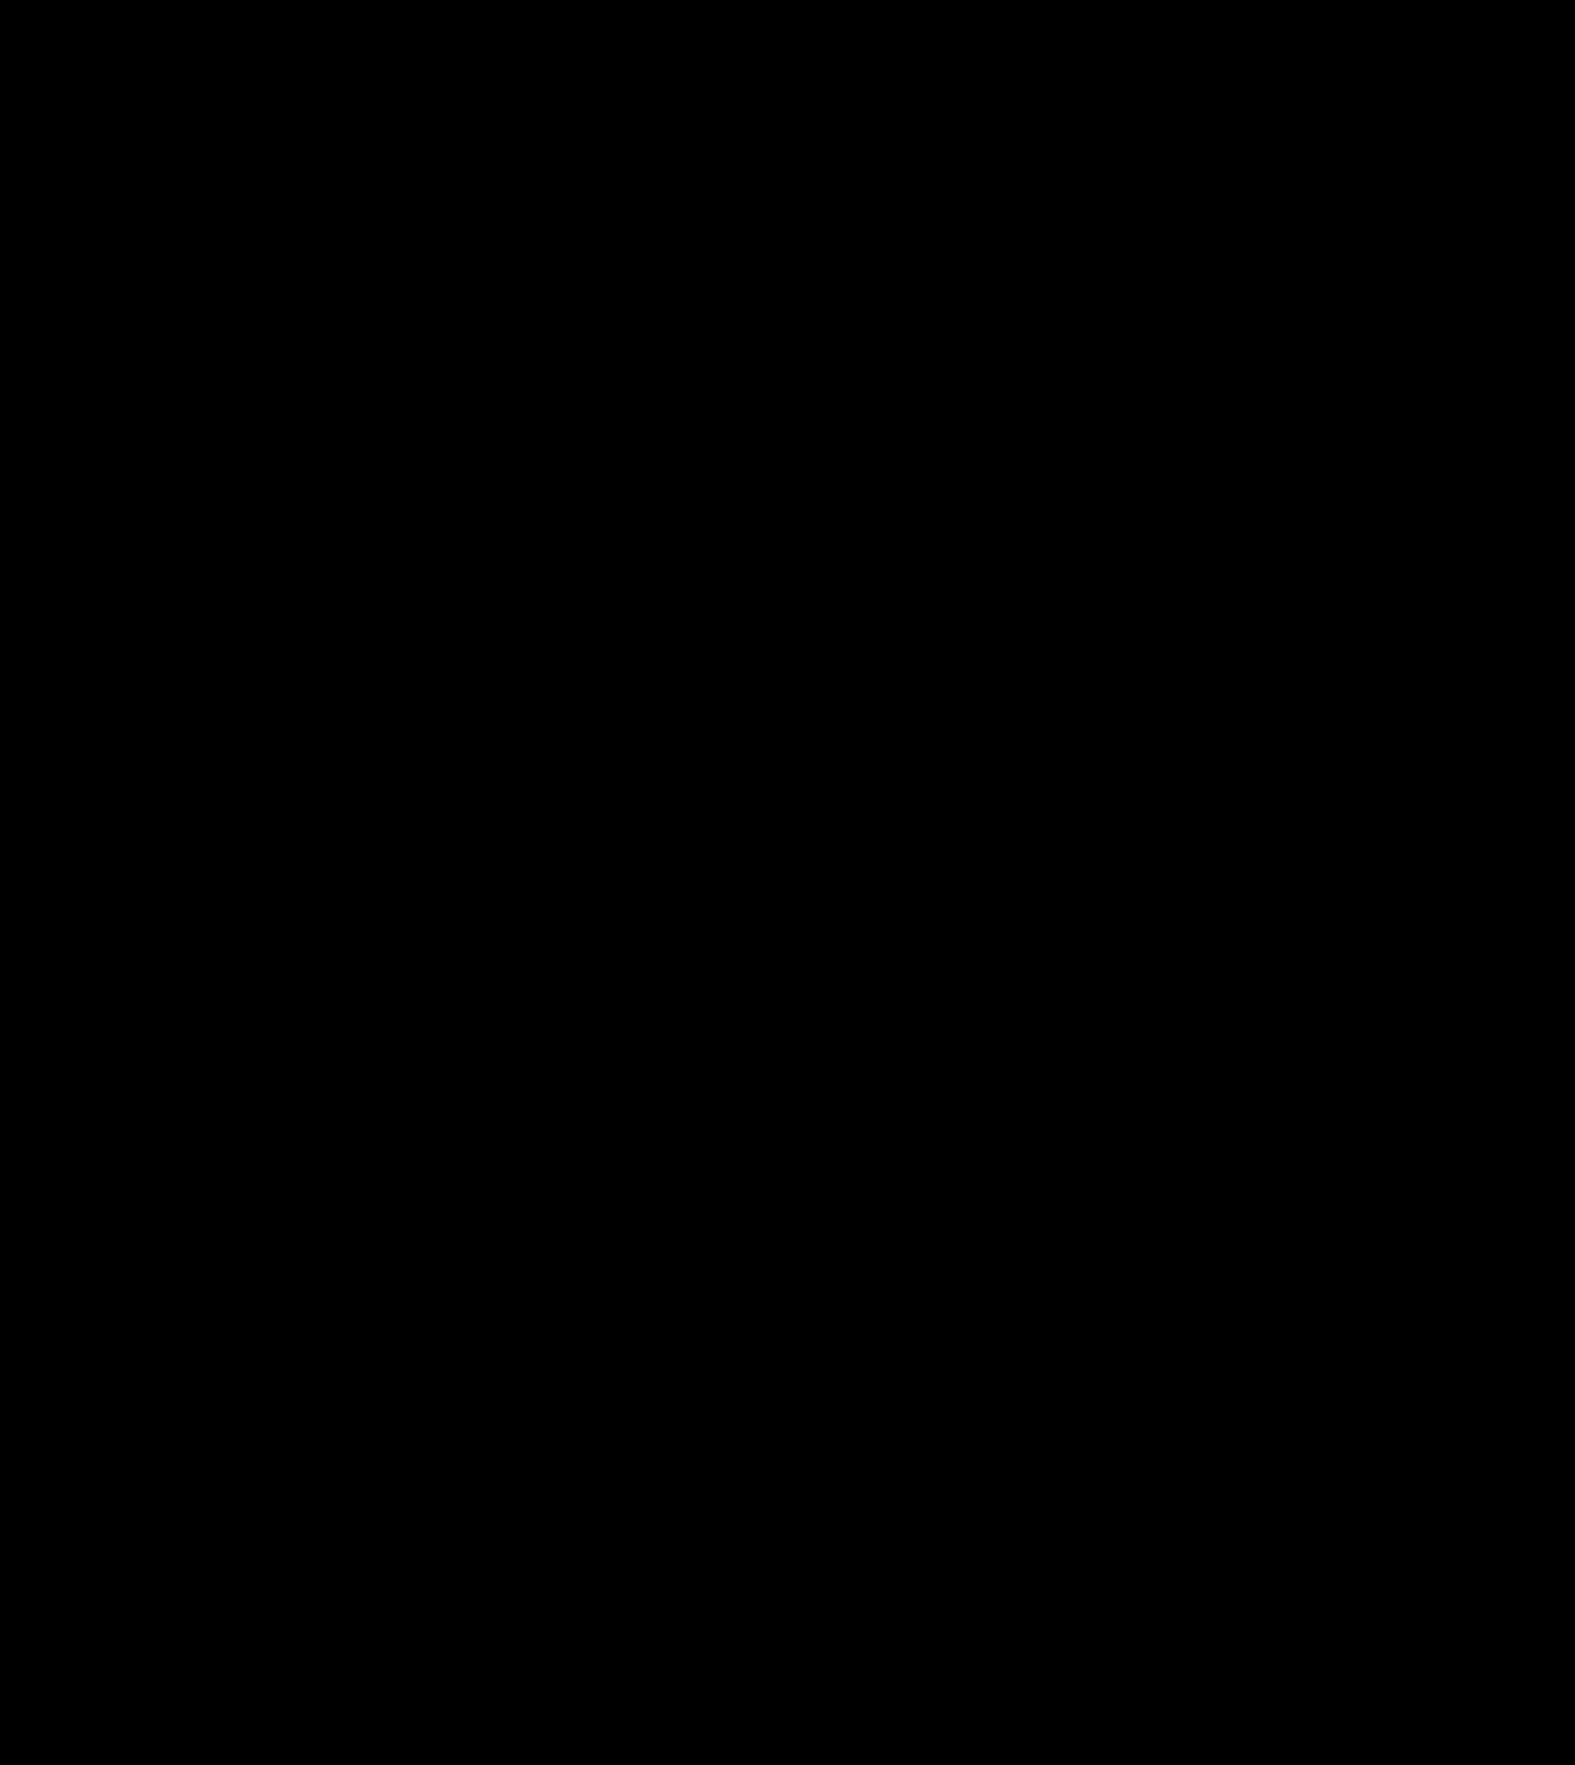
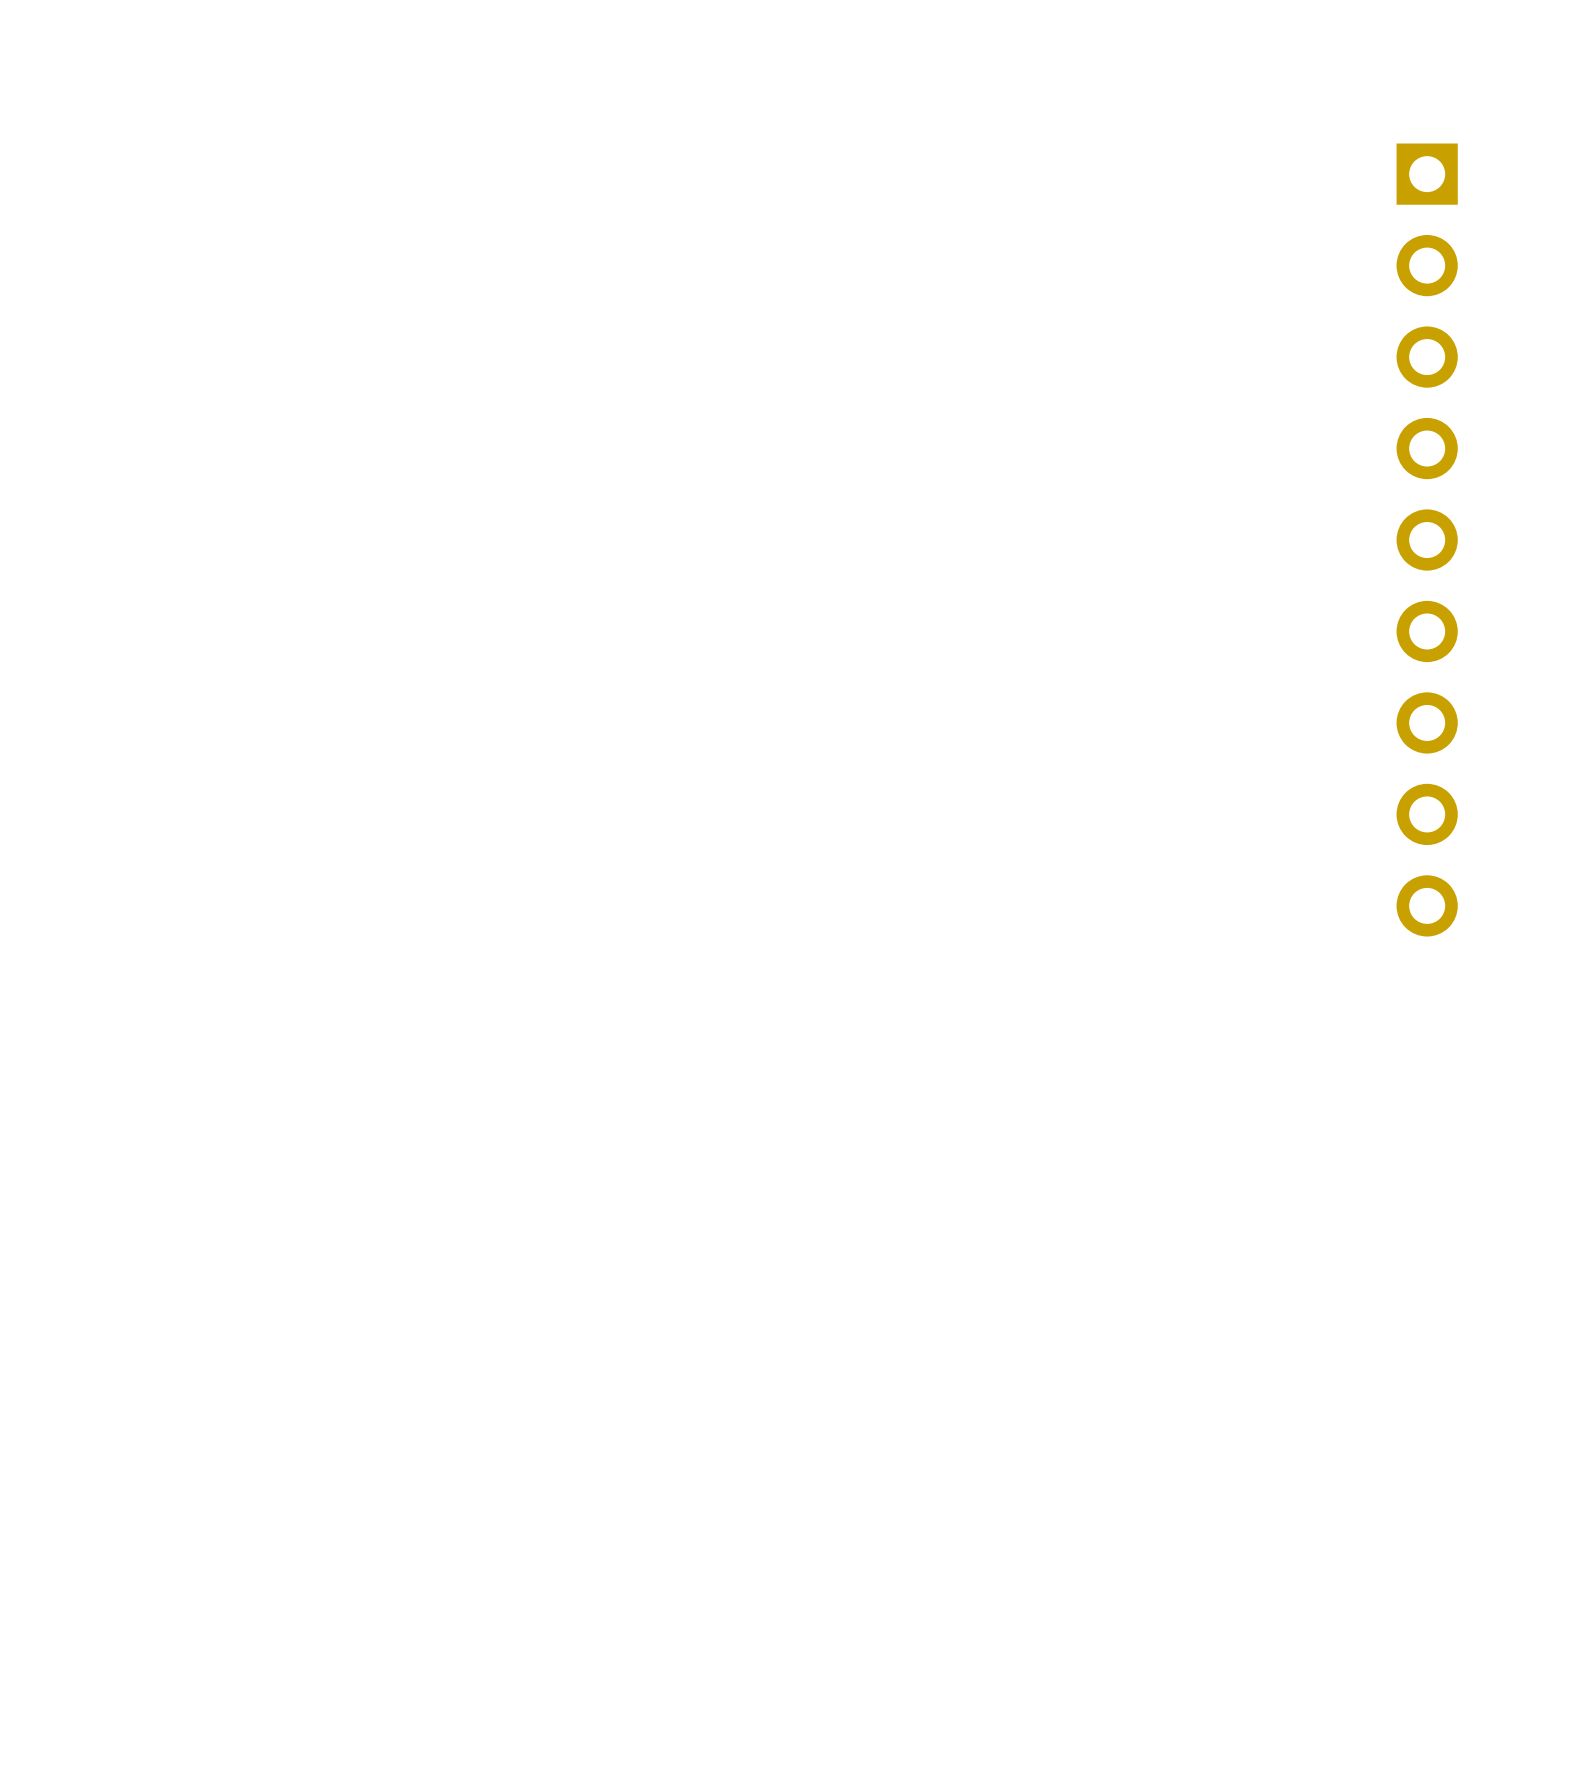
part: none -> (1427, 540)

